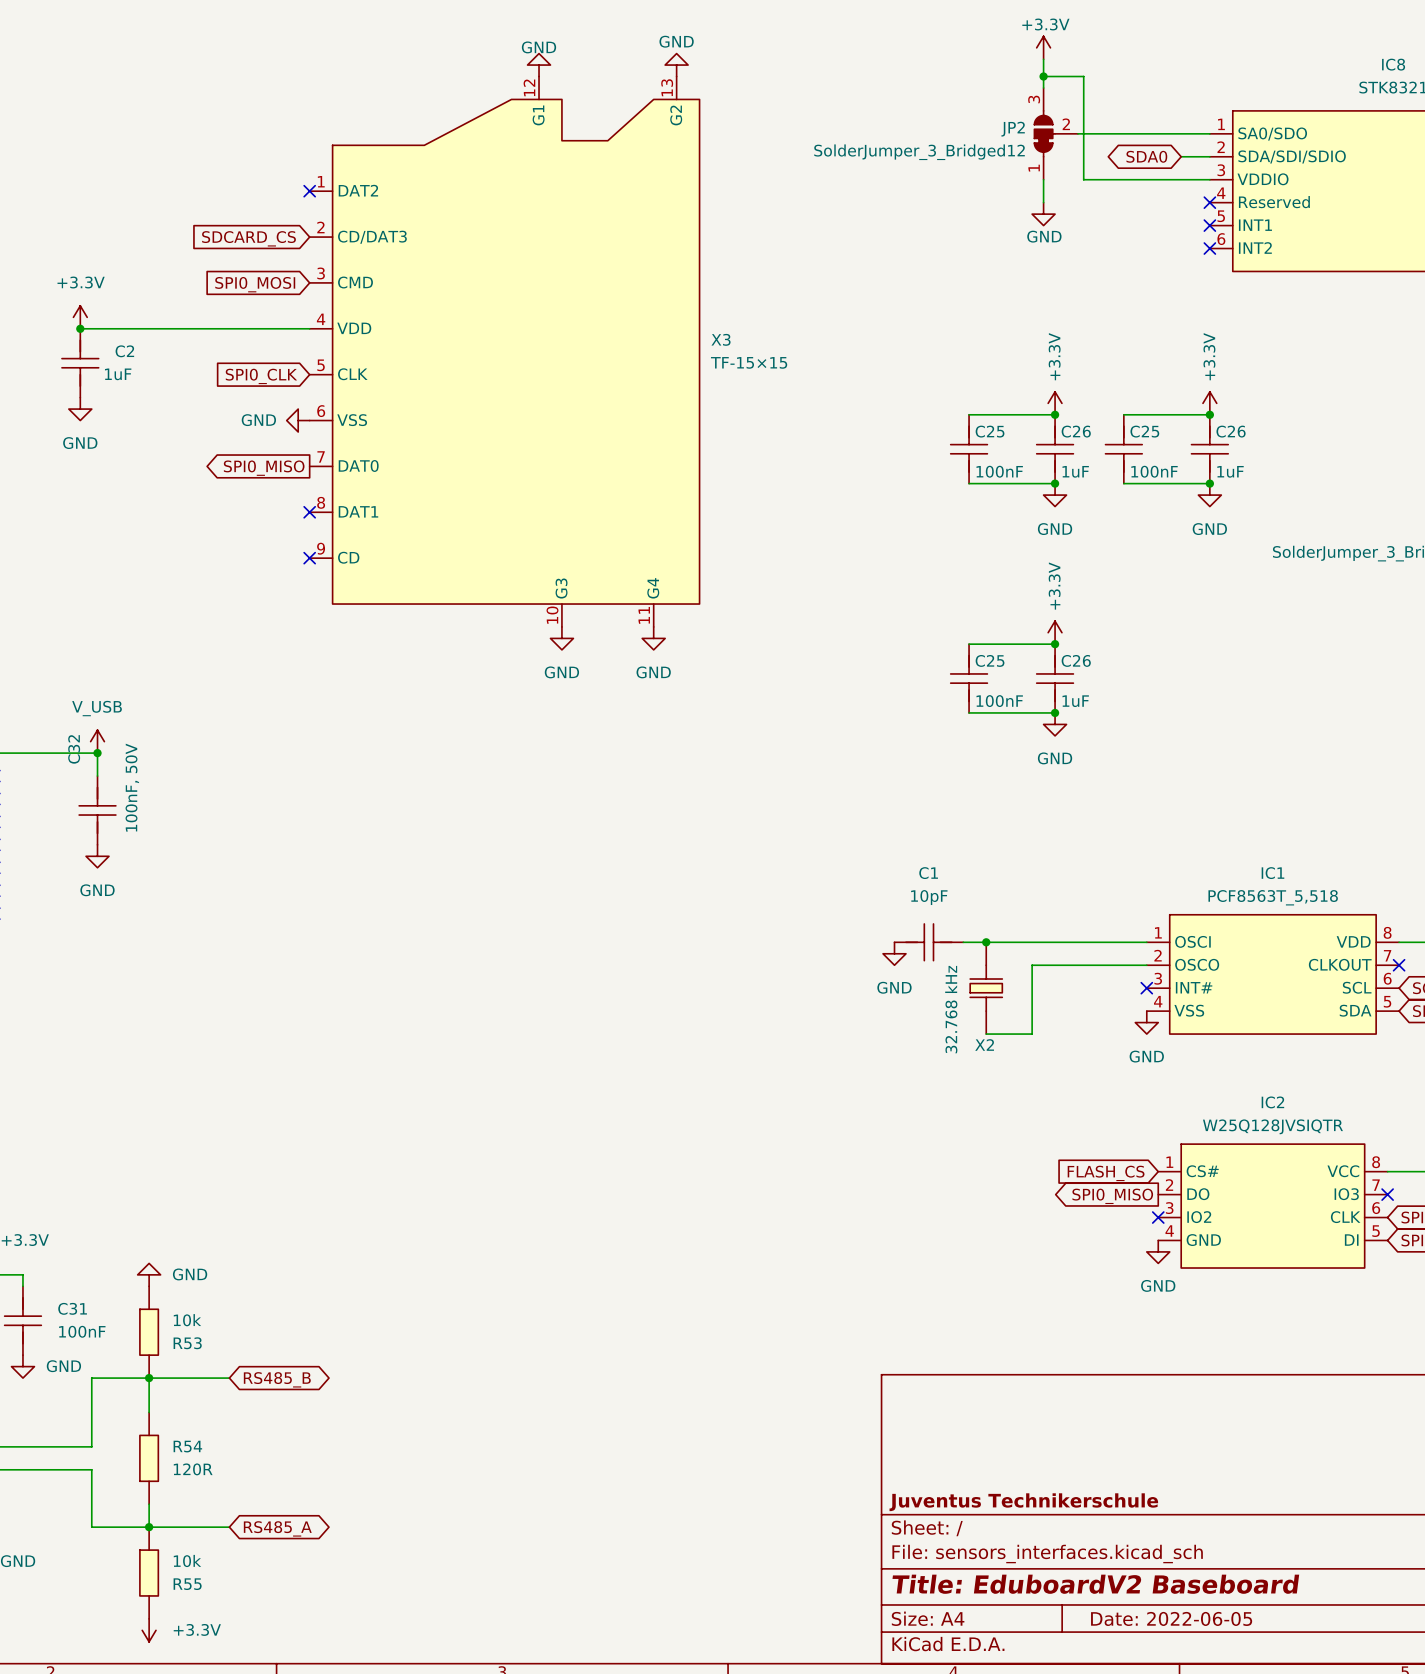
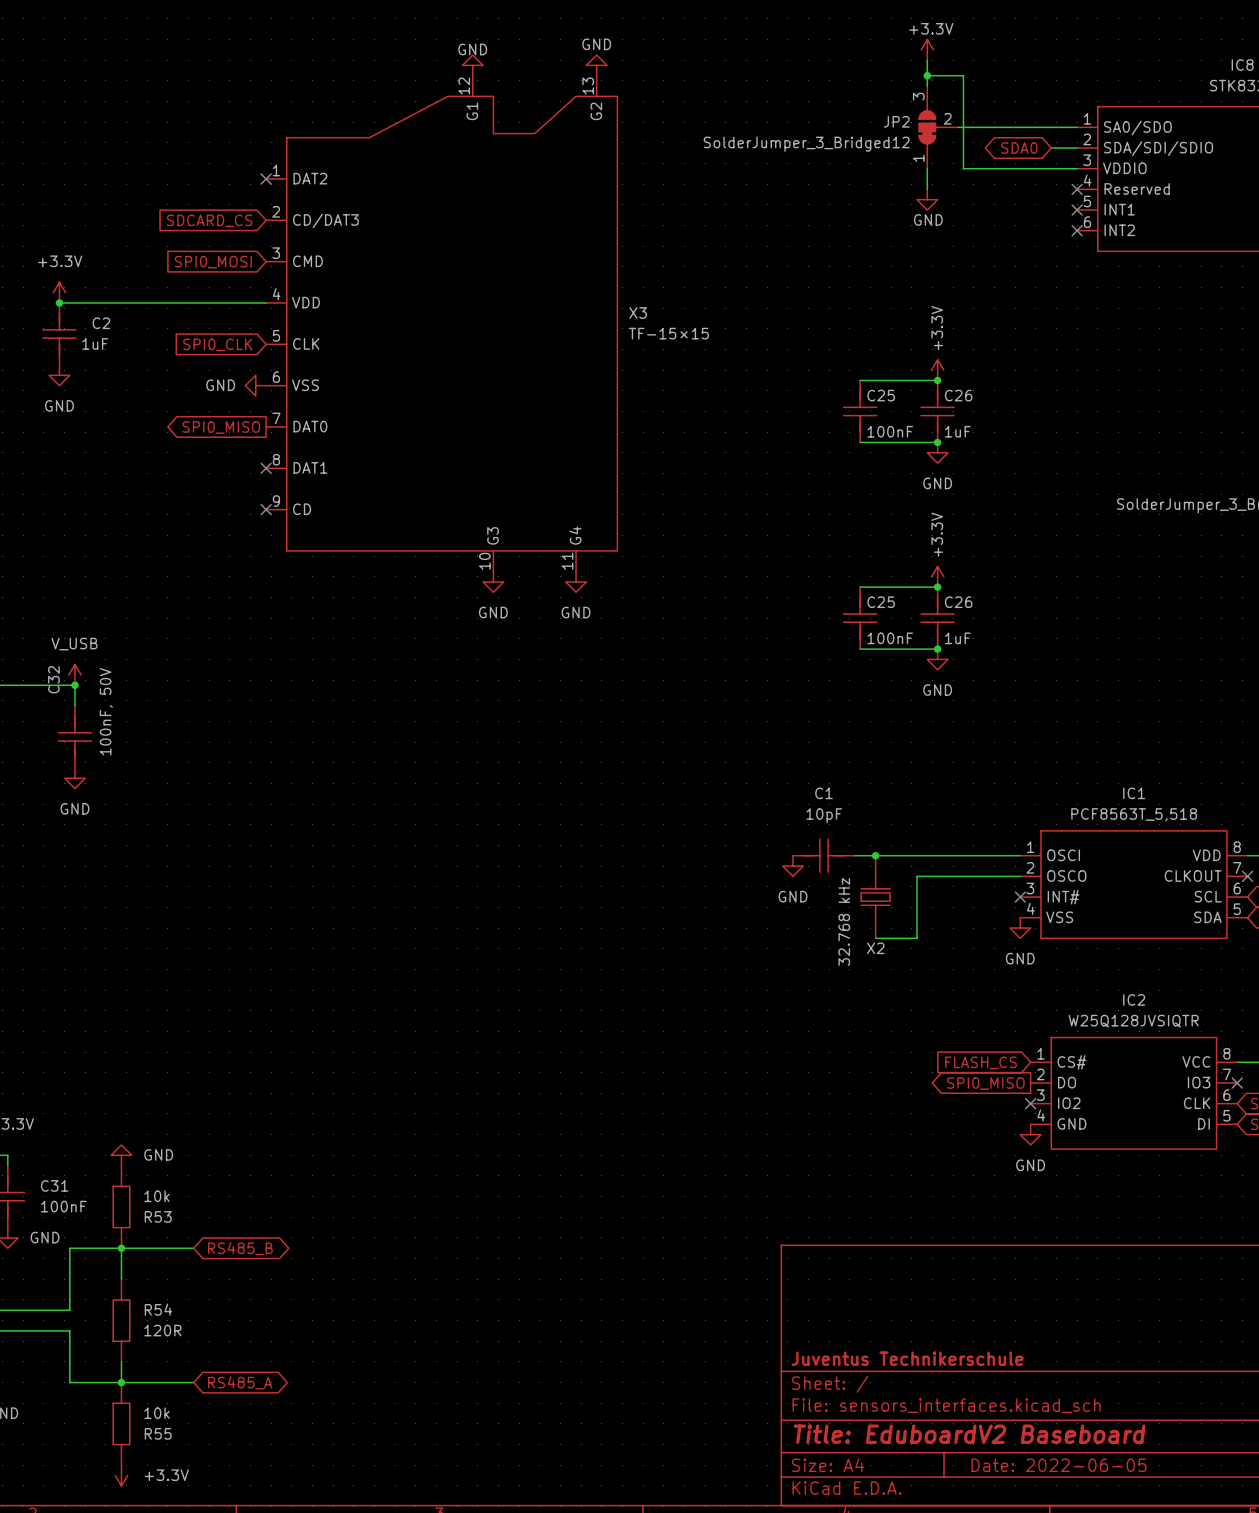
power symbol: +3.3V (1209, 403) -> none
wire: (1123, 414) (1209, 414) -> none
junction: (1209, 414) -> none
C25: 100nF (1123, 449) -> none
C26: 1uF (1209, 449) -> none
wire: (1123, 483) (1209, 483) -> none
junction: (1209, 483) -> none
power symbol: GND (1209, 495) -> none

